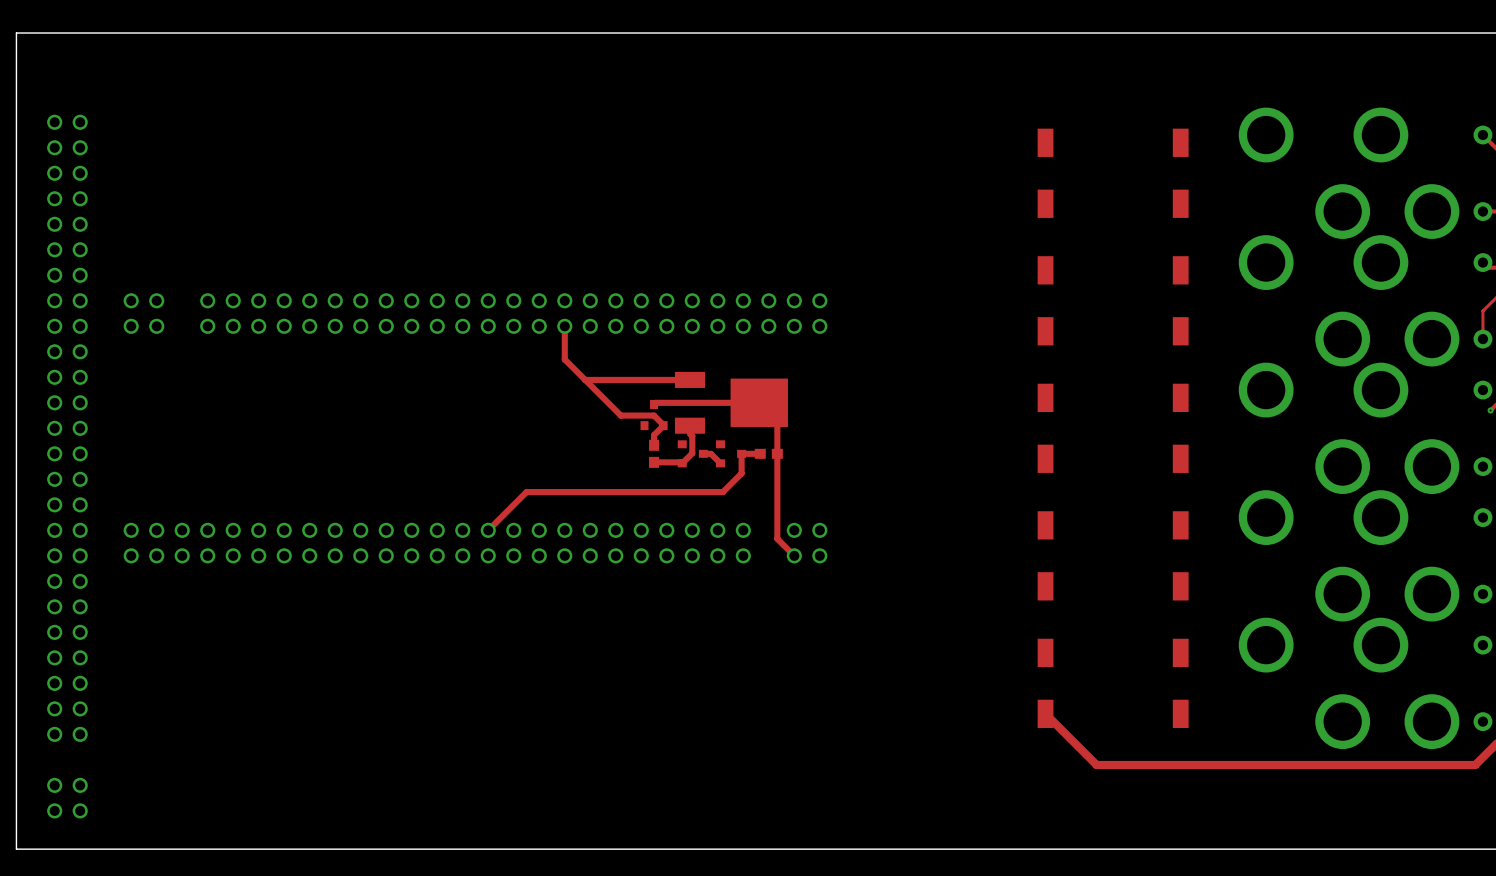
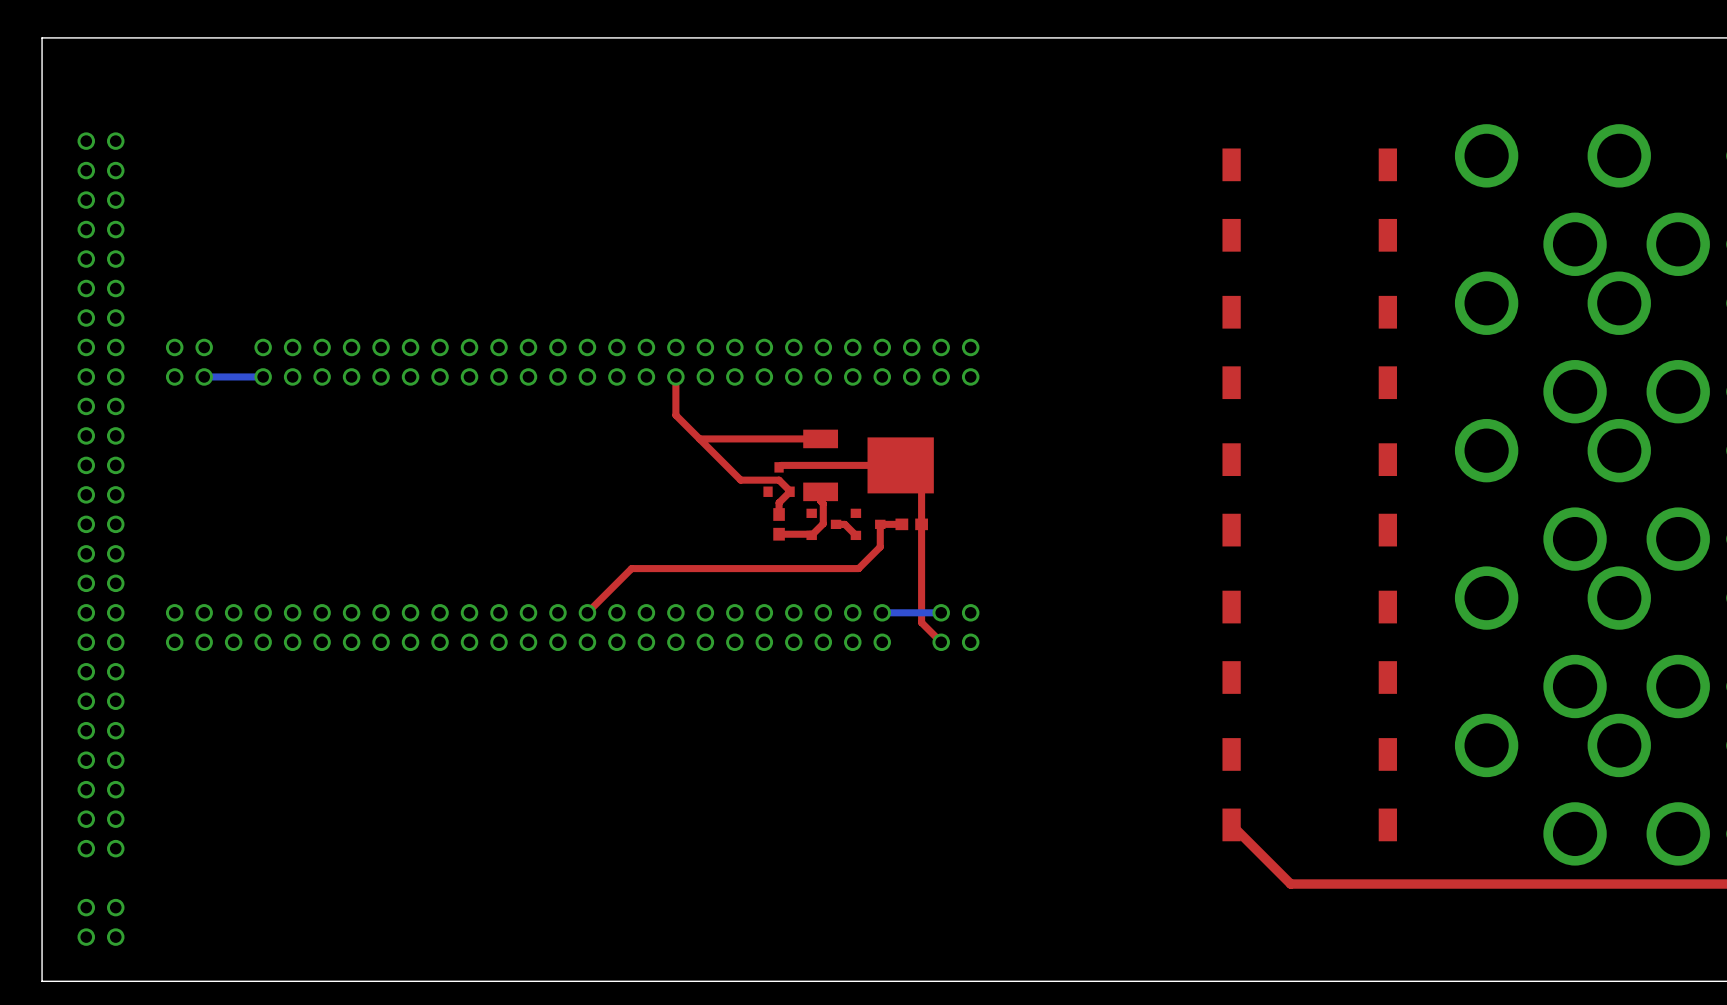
bottom track: none -> (263, 376) (204, 376)
bottom track: none -> (941, 612) (882, 612)

